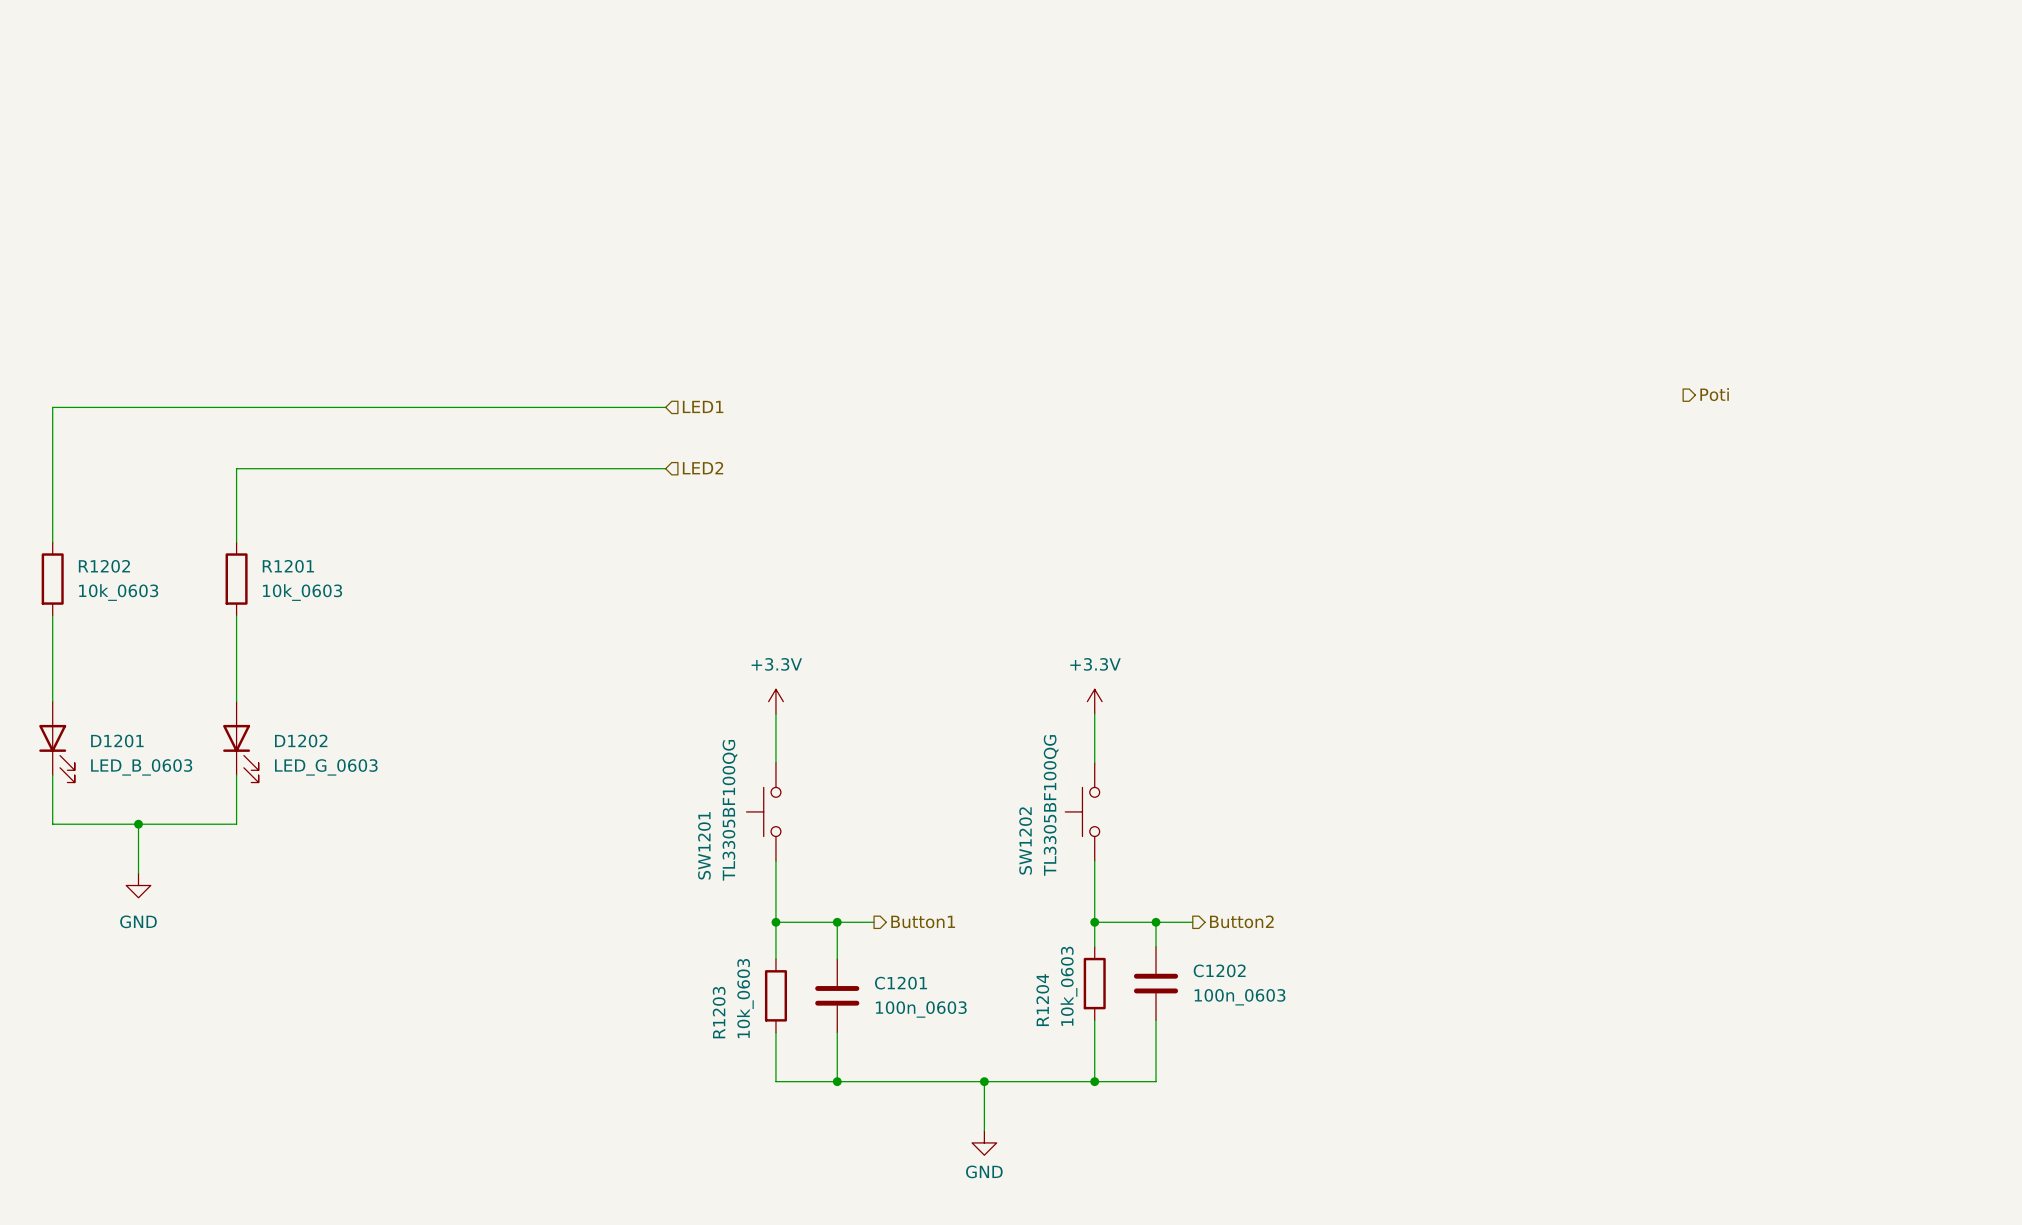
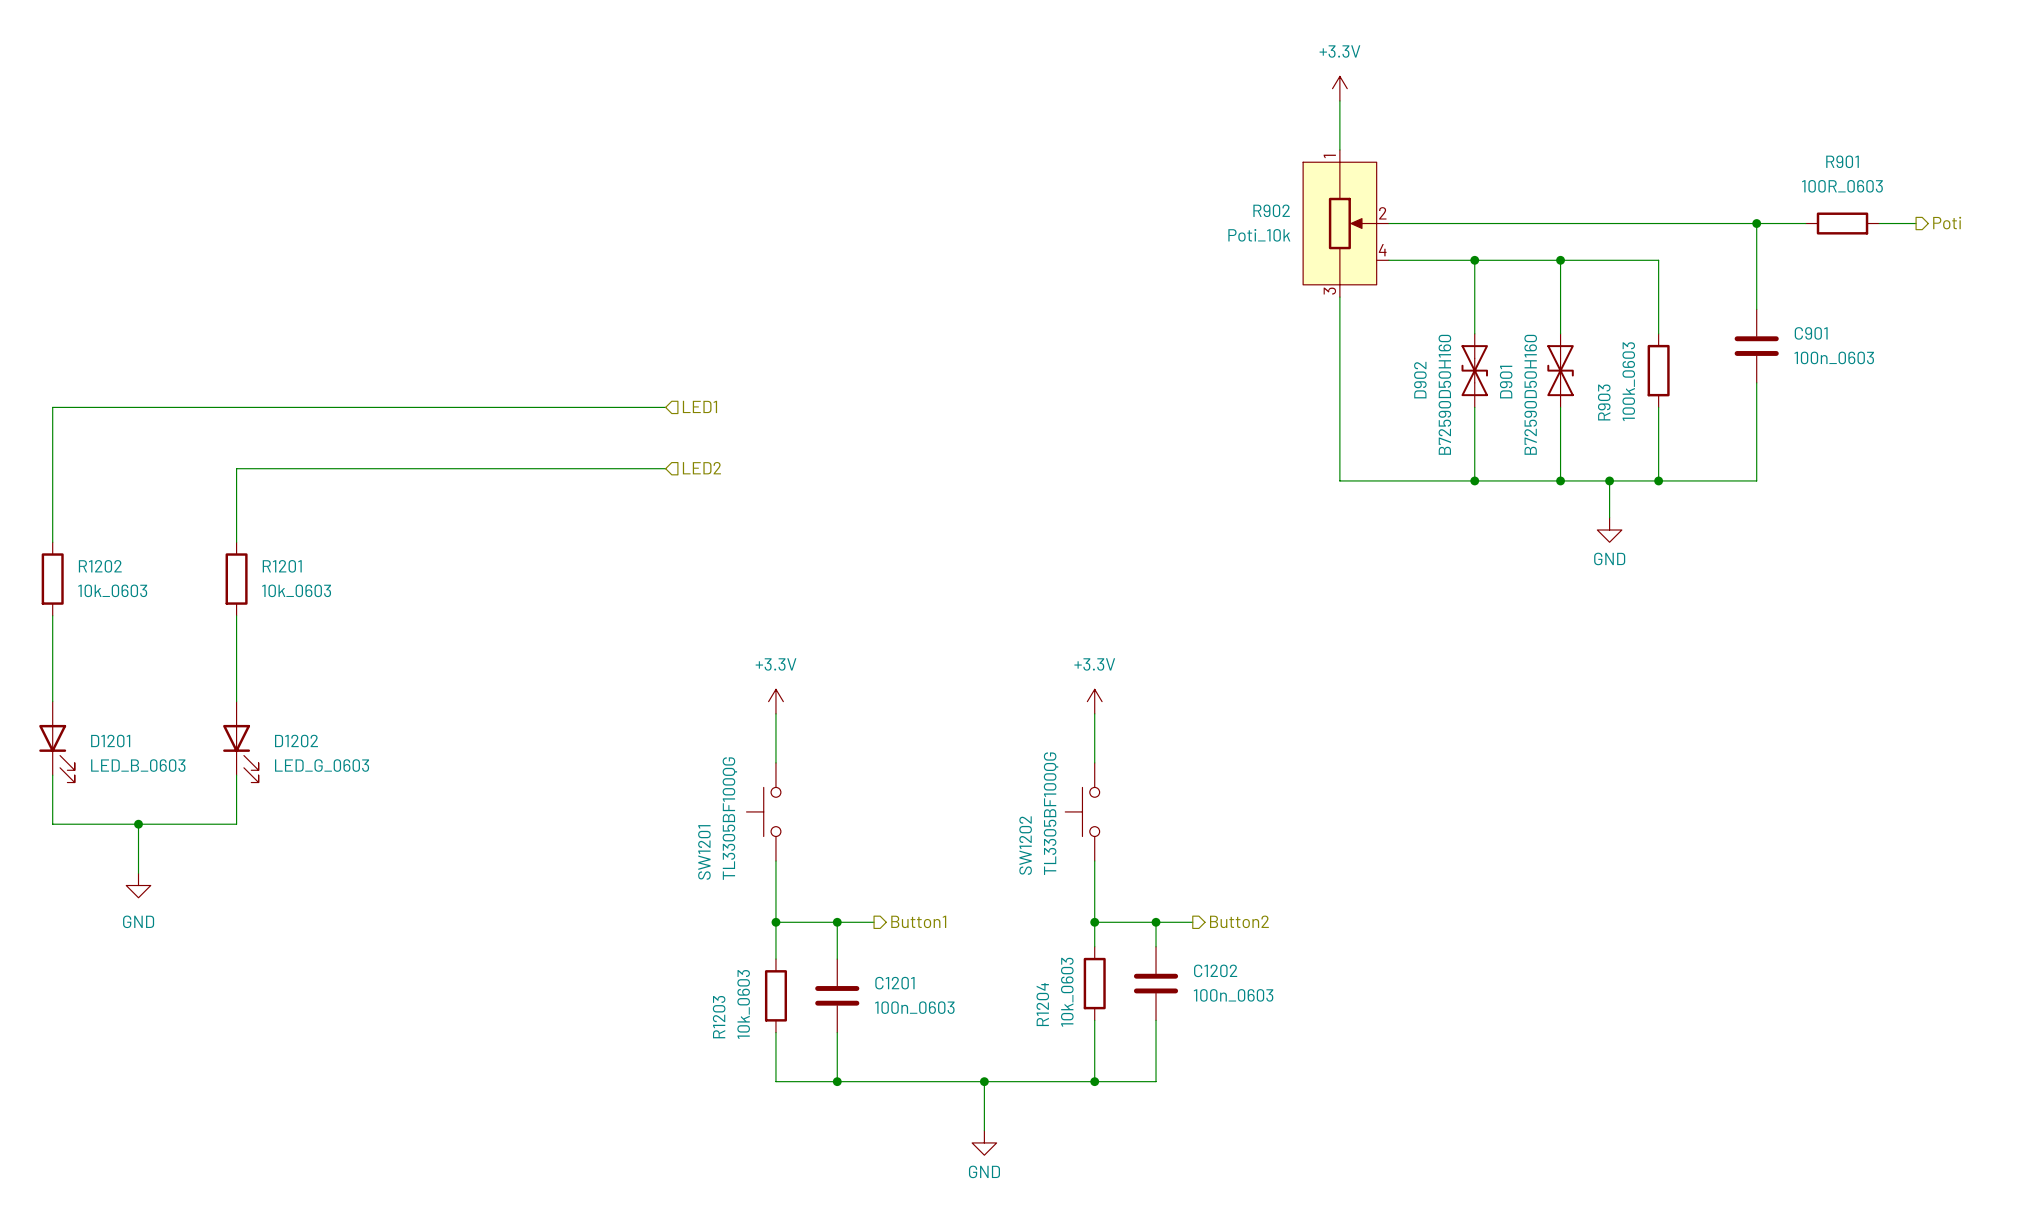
power symbol: none -> +3.3V (1339, 88)
wire: none -> (1339, 100) (1339, 149)
hierarchical label: none -> Poti (1947, 223)
R902: none -> Poti_10k (1346, 223)
wire: none -> (1388, 223) (1805, 223)
wire: none -> (1756, 223) (1756, 309)
junction: none -> (1756, 223)
R901: none -> 100R_0603 (1842, 223)
wire: none -> (1879, 223) (1916, 223)
wire: none -> (1388, 260) (1658, 260) (1658, 333)
wire: none -> (1474, 260) (1474, 333)
junction: none -> (1474, 260)
wire: none -> (1560, 260) (1560, 333)
junction: none -> (1560, 260)
wire: none -> (1339, 297) (1339, 480) (1756, 480) (1756, 382)
C901: none -> 100n_0603 (1756, 346)
D902: none -> B72590D50H160 (1474, 370)
D901: none -> B72590D50H160 (1560, 370)
R903: none -> 100k_0603 (1658, 370)
hierarchical label: Poti (1714, 394) -> none
wire: none -> (1474, 407) (1474, 480)
wire: none -> (1560, 407) (1560, 480)
wire: none -> (1658, 407) (1658, 480)
junction: none -> (1474, 480)
junction: none -> (1560, 480)
wire: none -> (1609, 480) (1609, 517)
junction: none -> (1609, 480)
junction: none -> (1658, 480)
power symbol: none -> GND (1609, 530)

